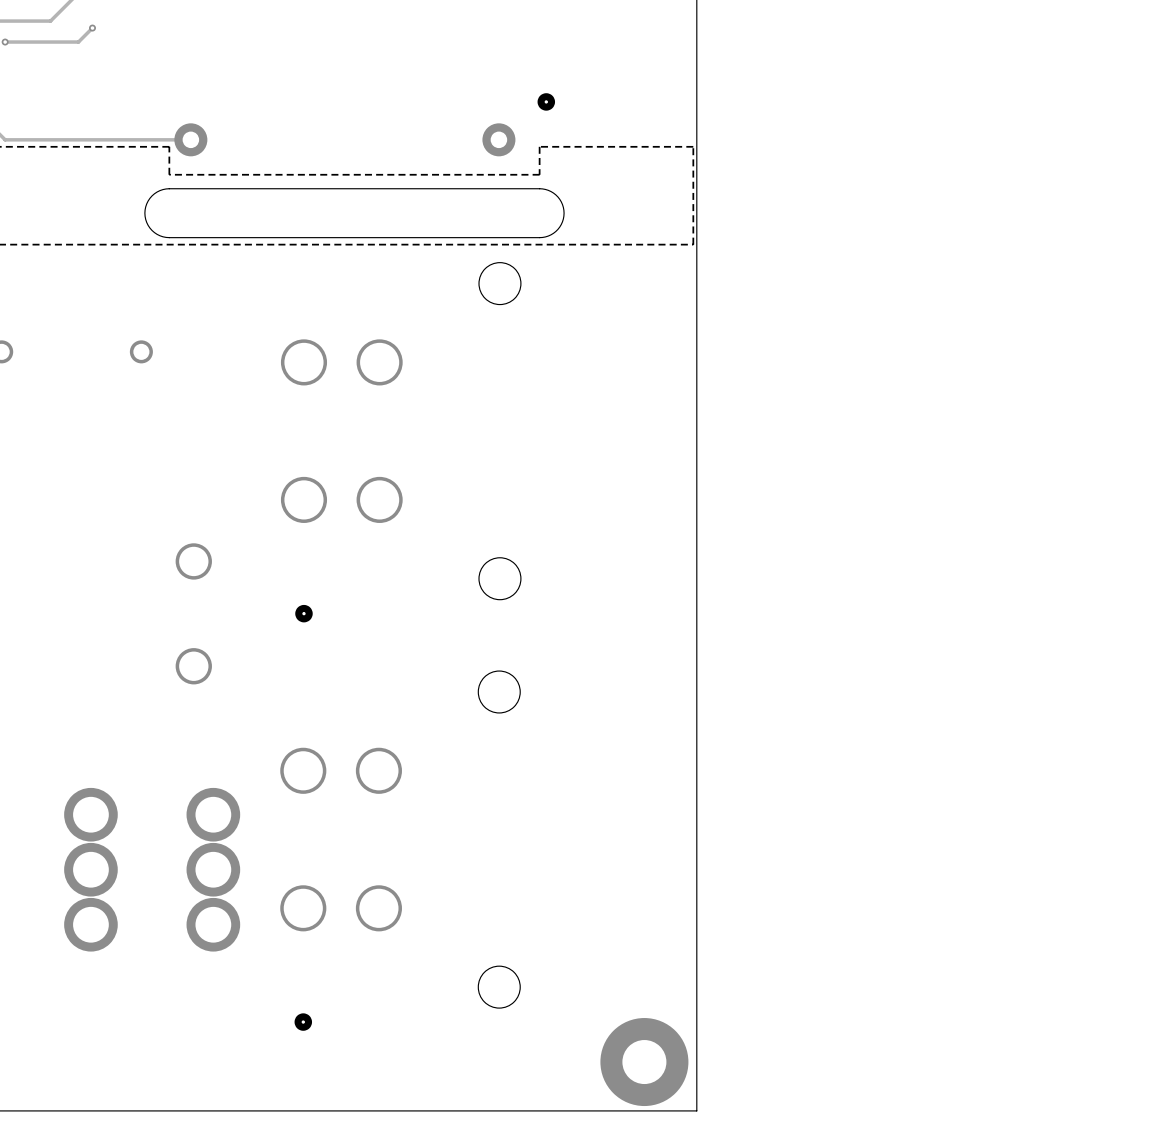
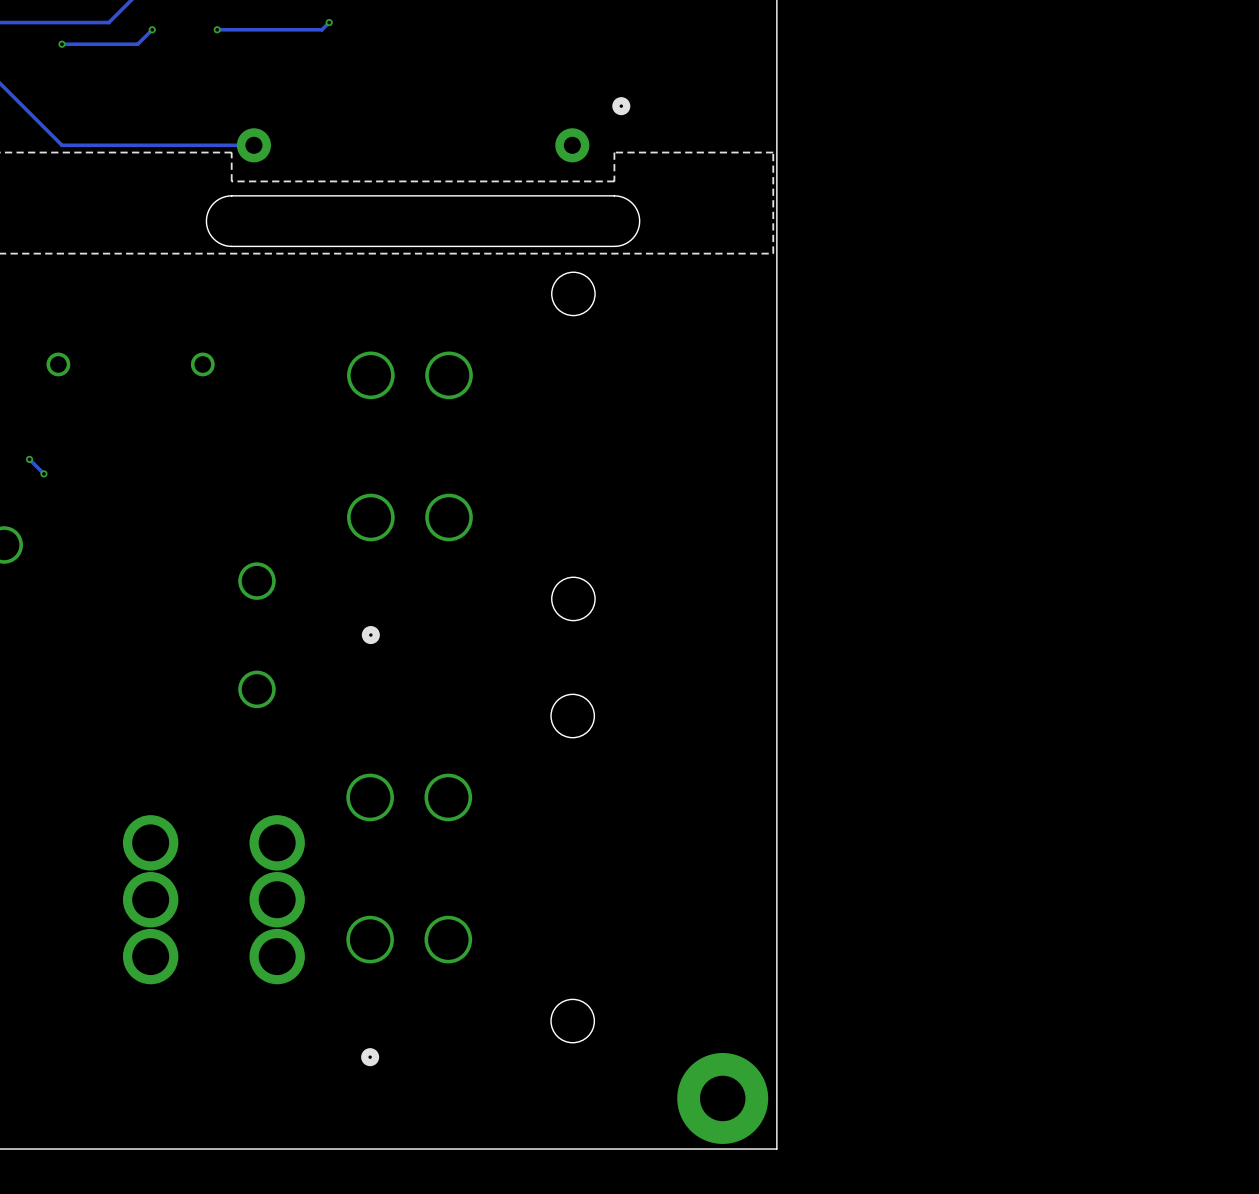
track: none -> (329, 22) (321, 29) (217, 29)
via: none -> (329, 22)
via: none -> (217, 29)

